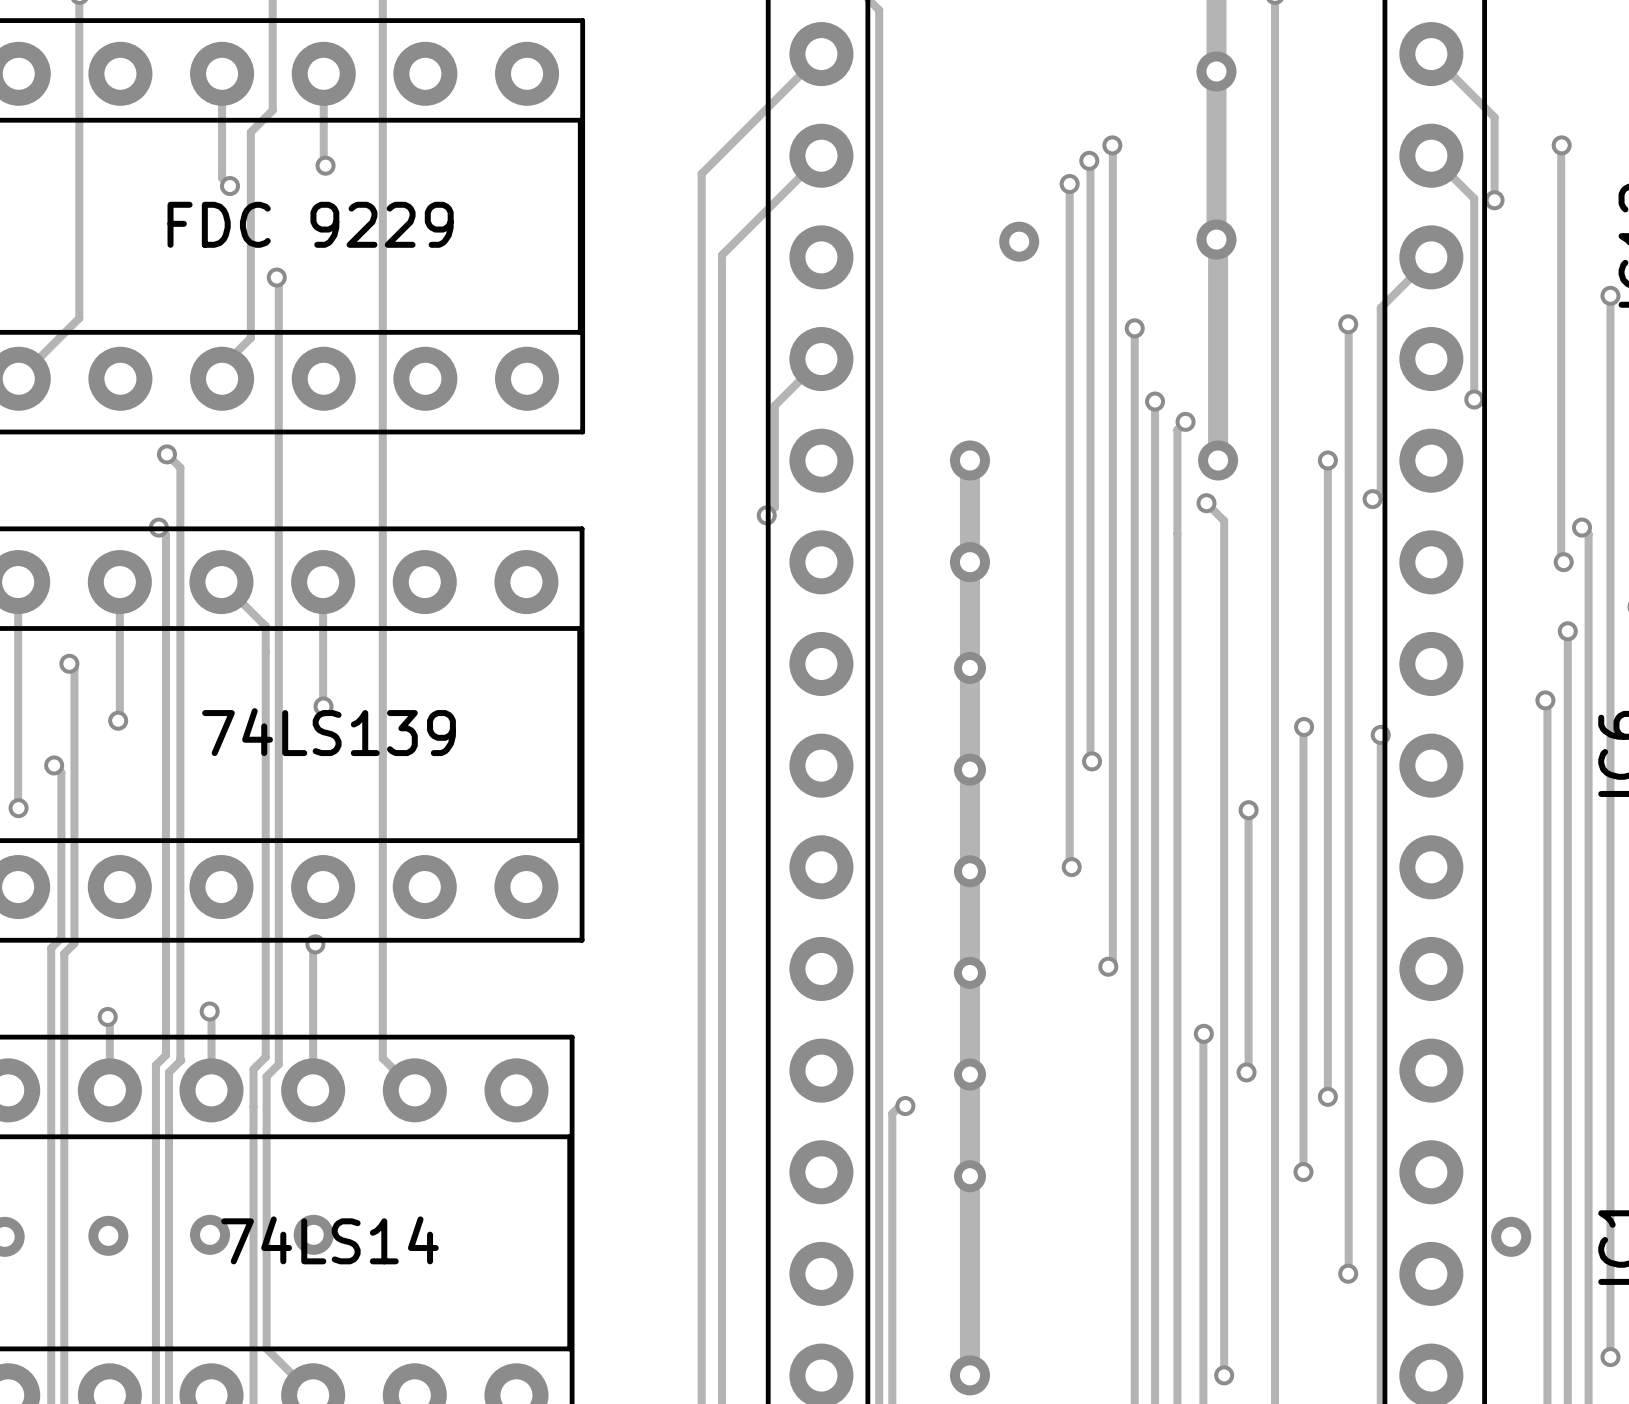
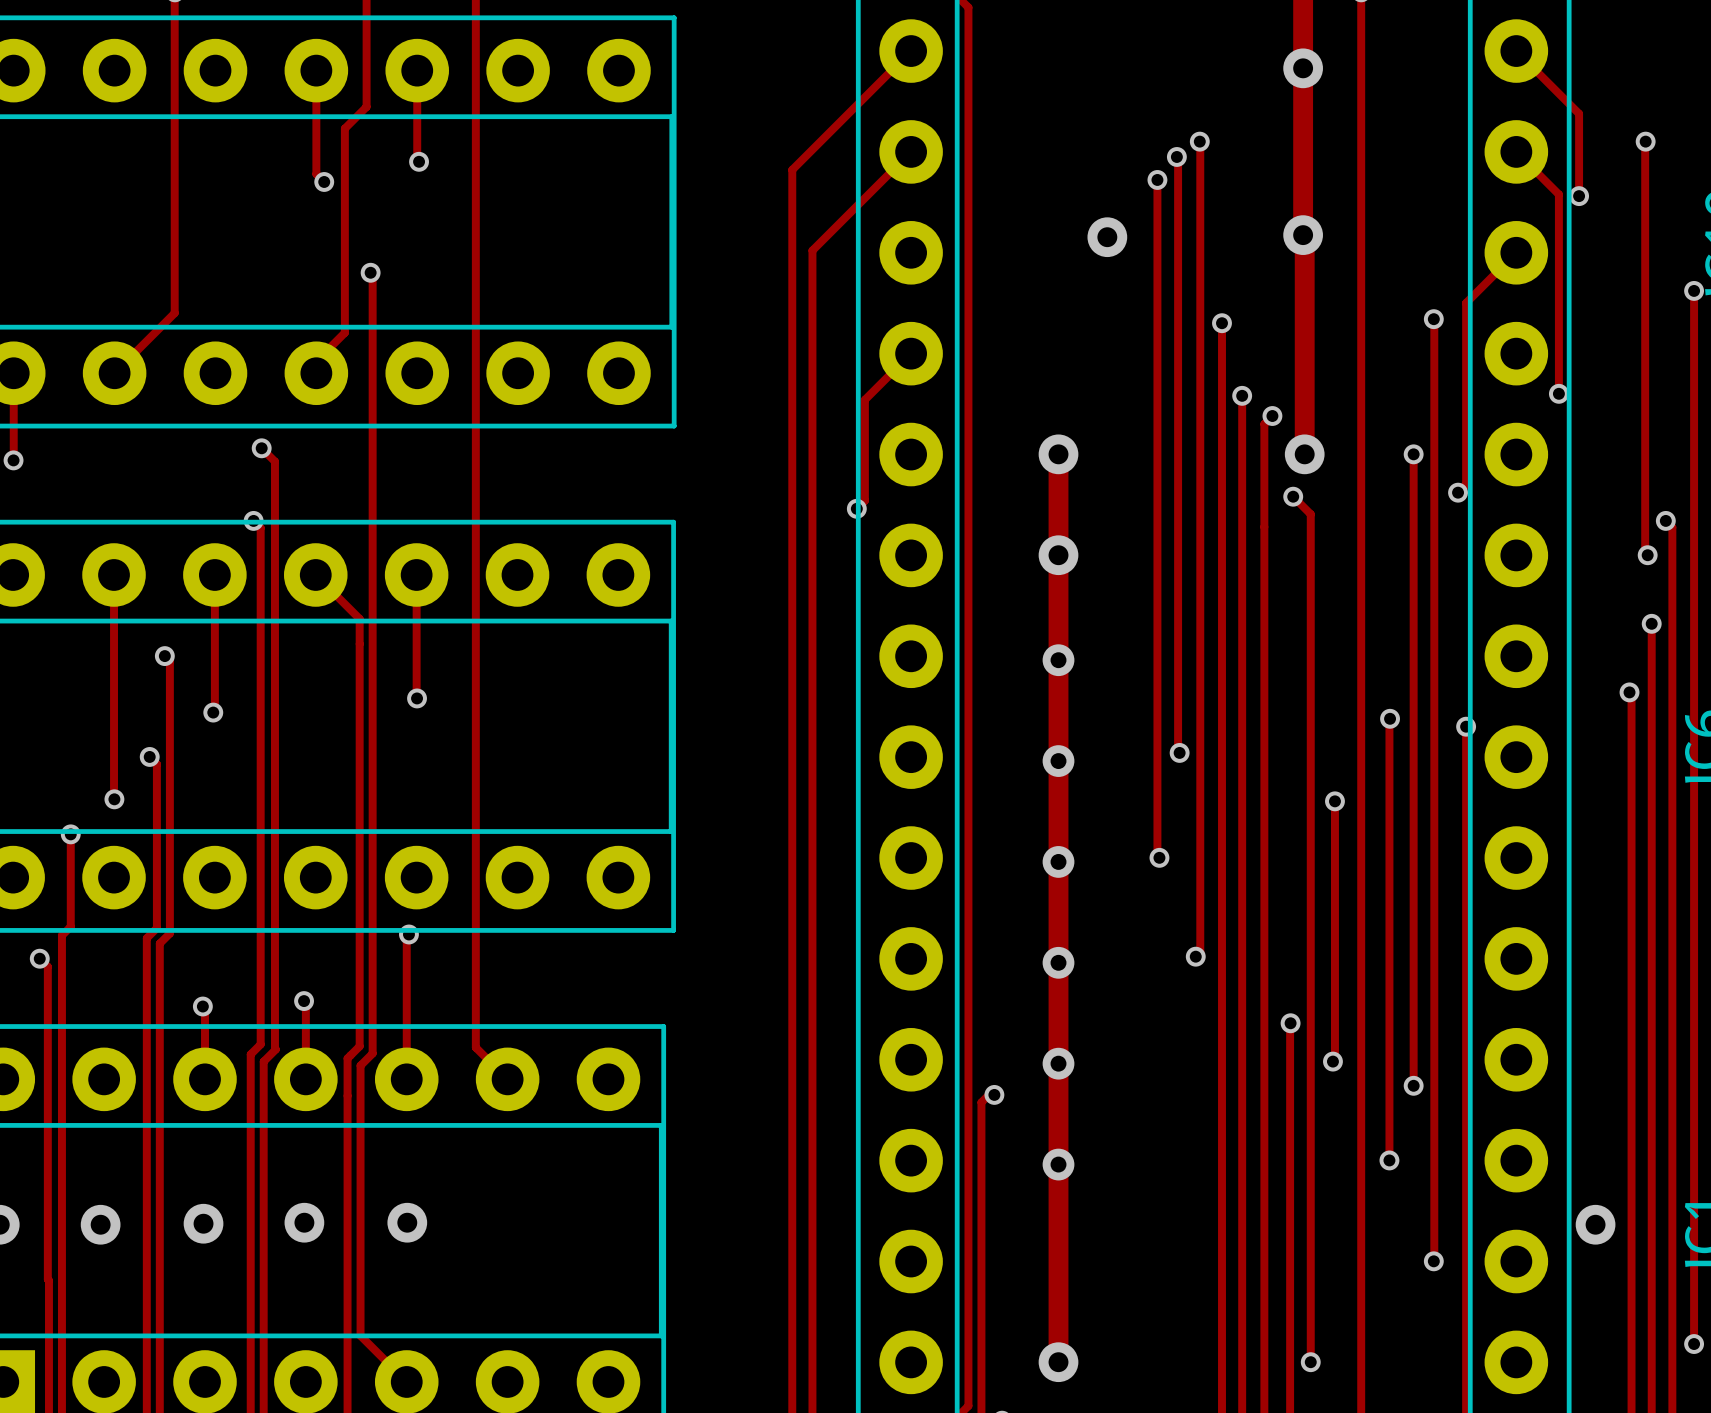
part value: FDC 9229 (310, 224) -> none
part value: 74LS139 (329, 732) -> none
part value: 74LS14 (329, 1240) -> none

